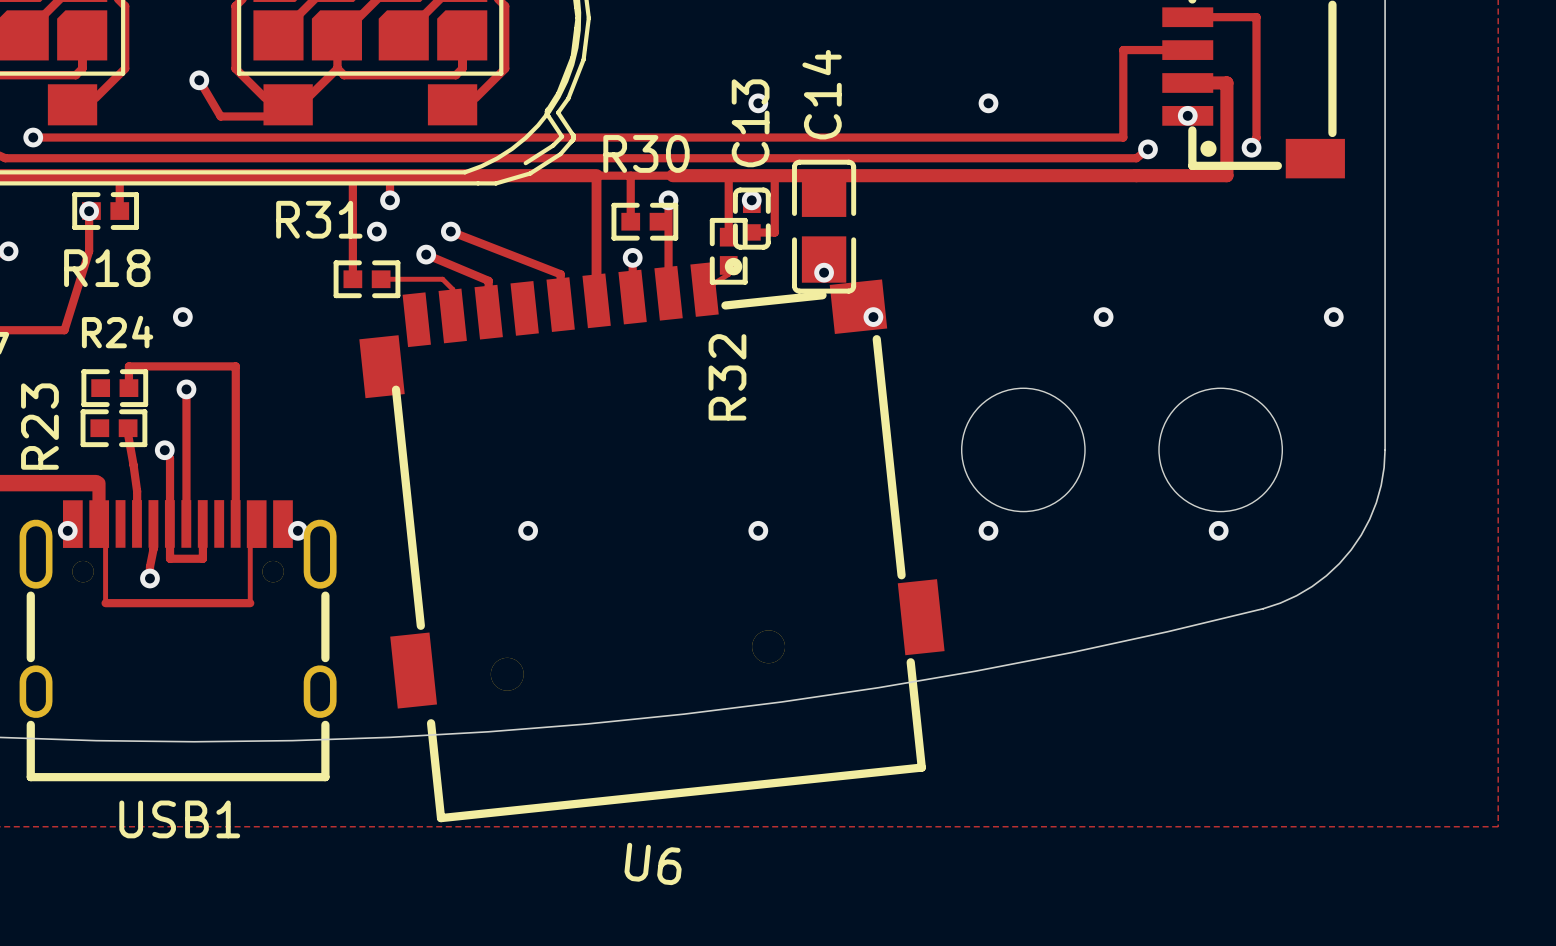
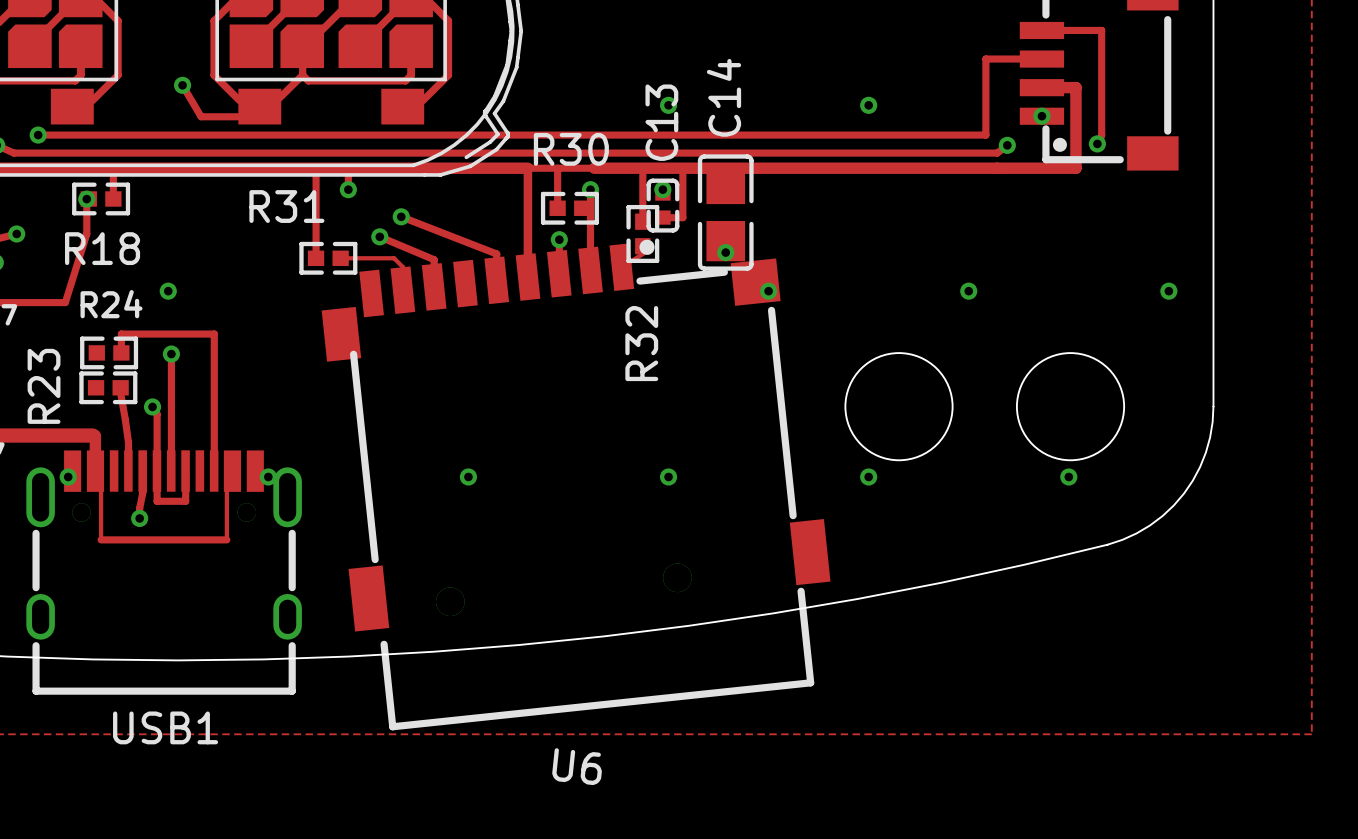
via: (376, 231) -> none

